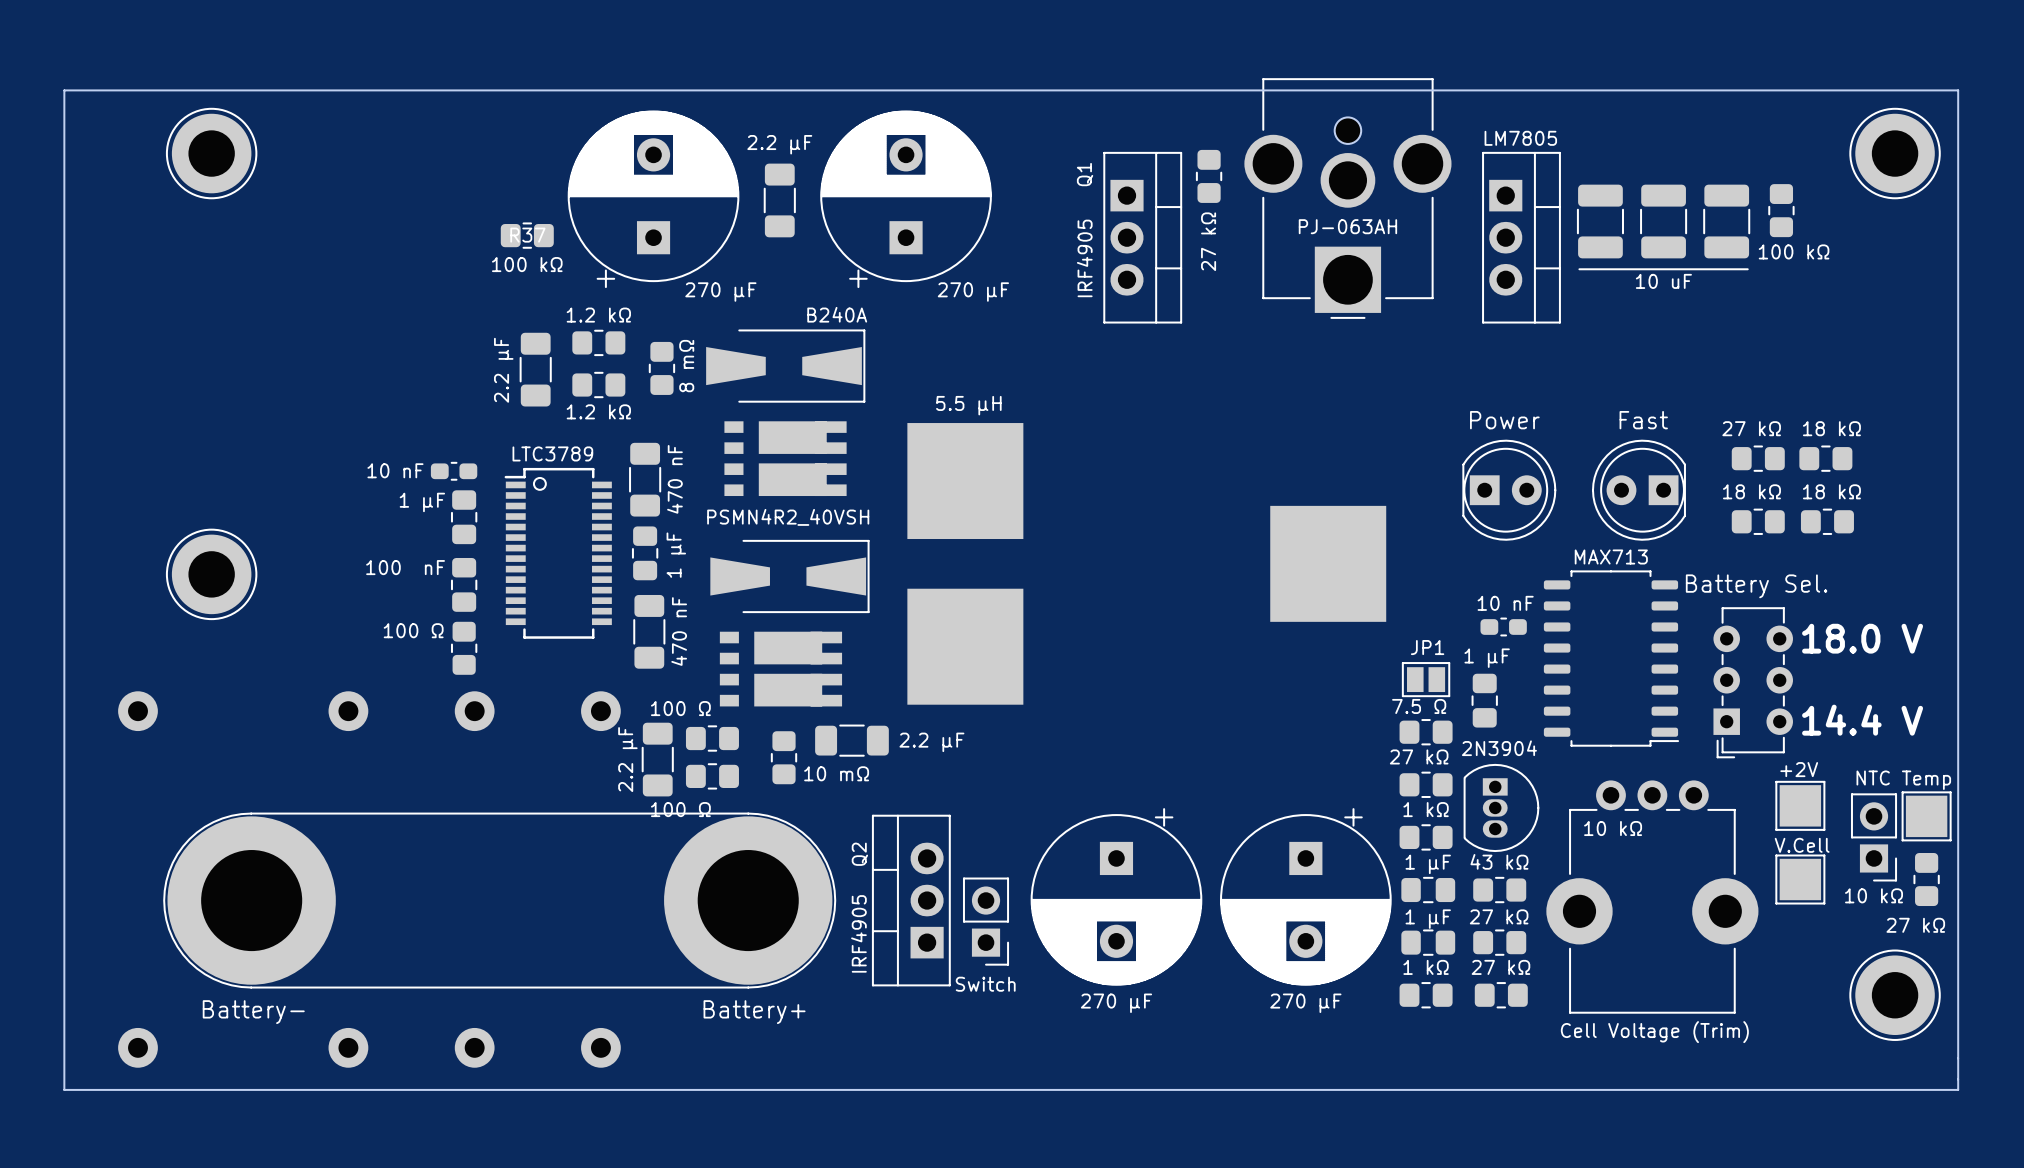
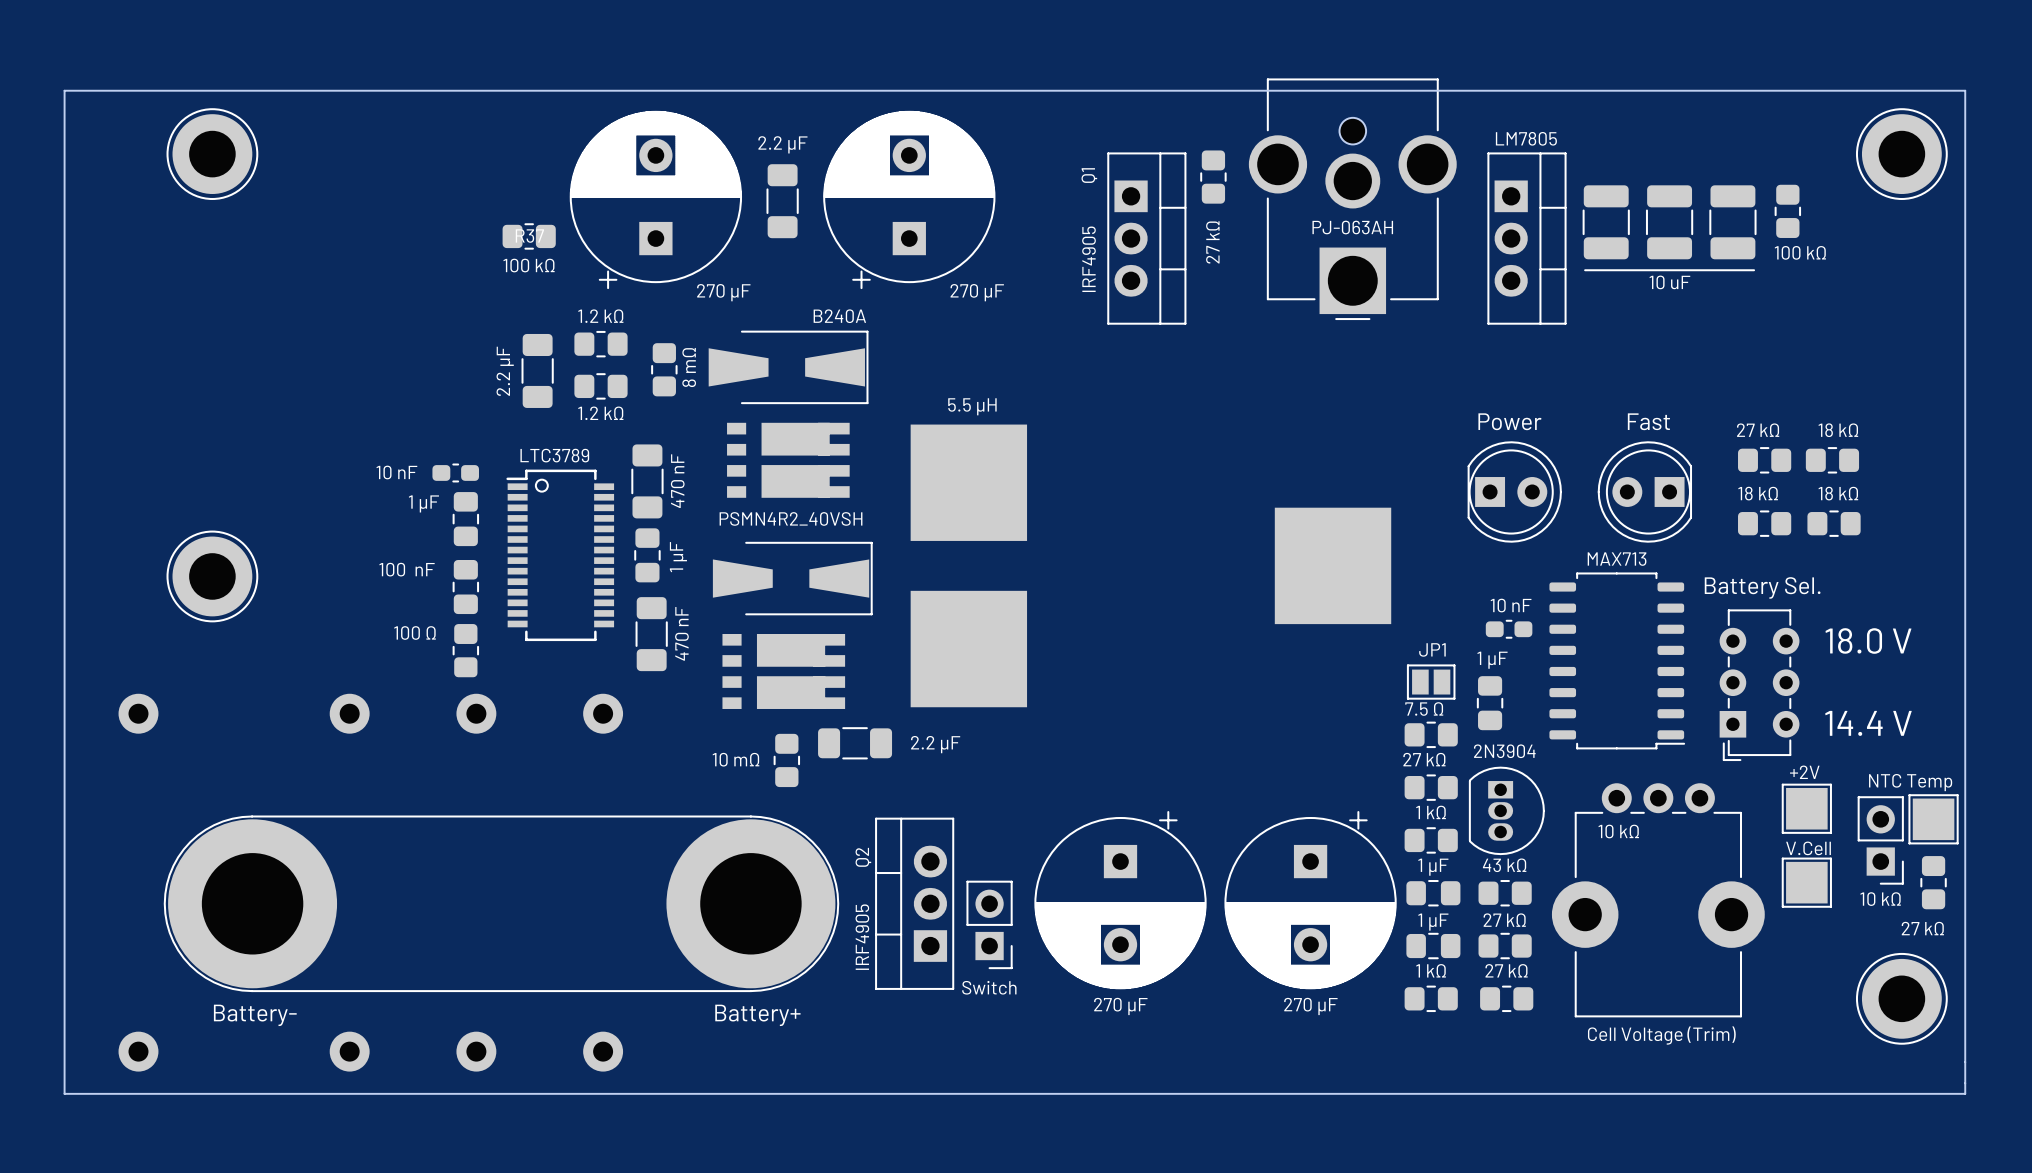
part: 100 Ω (712, 738) -> none
part: 2.2 μF (657, 759) -> none
part value position: 10 mΩ (836, 773) -> 10 mΩ (736, 759)
part: 100 Ω (712, 776) -> none

